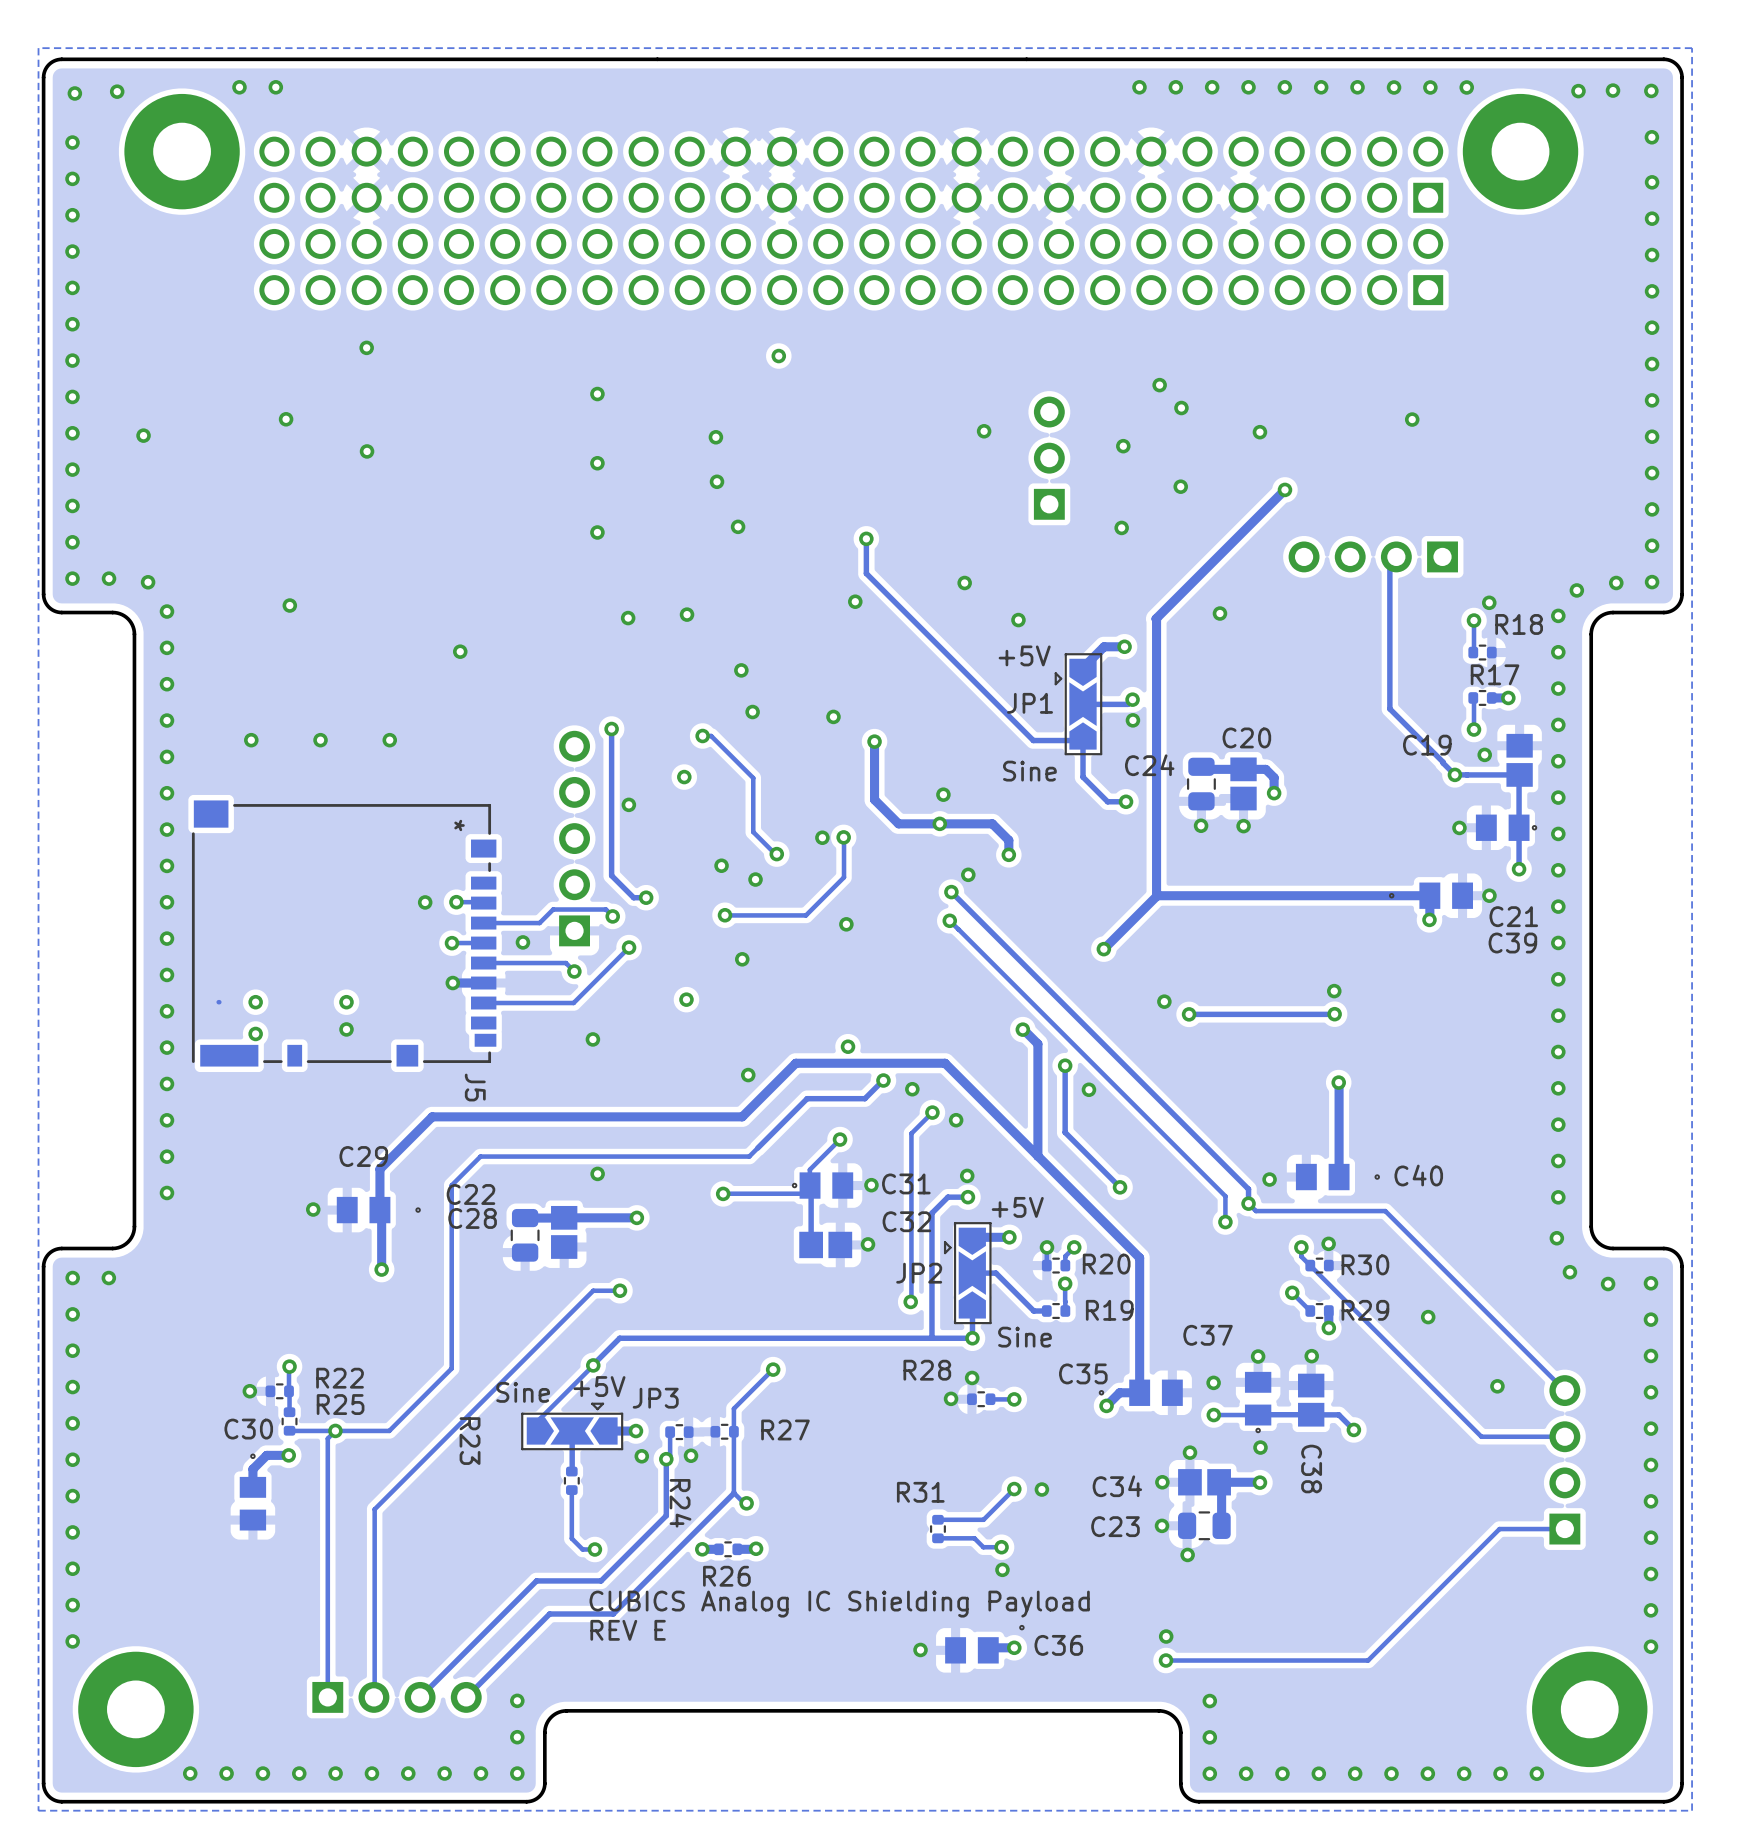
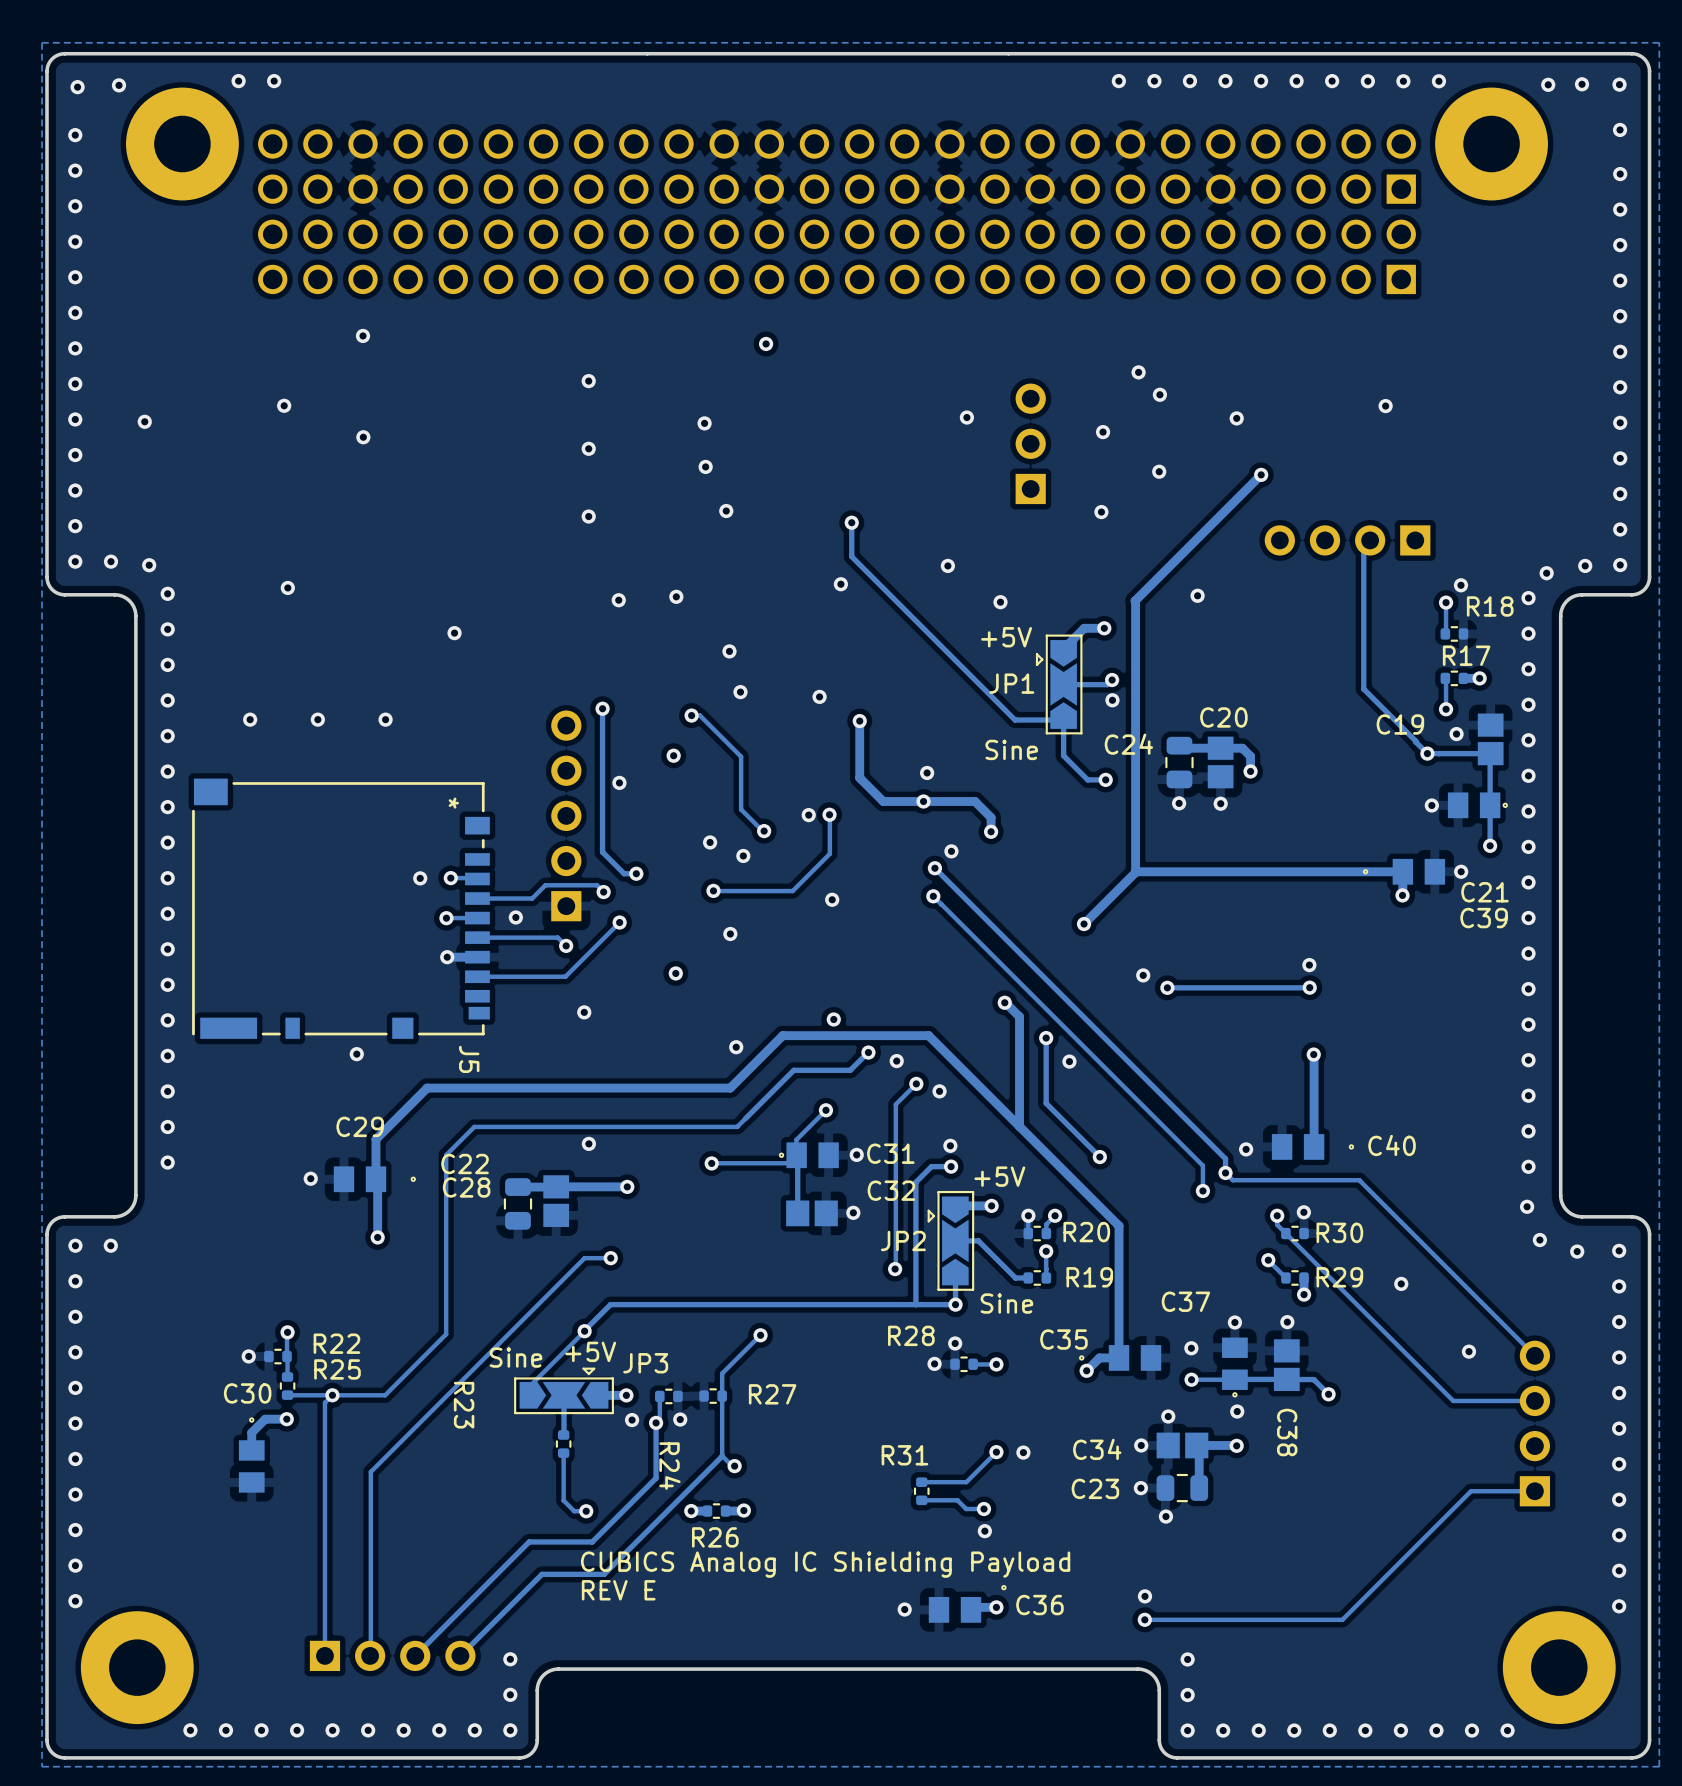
track: (219, 1002) (218, 1002) -> none
via: (255, 1002) -> none
via: (346, 1002) -> none
via: (346, 1029) -> none
via: (255, 1033) -> none
via: none -> (356, 1054)

